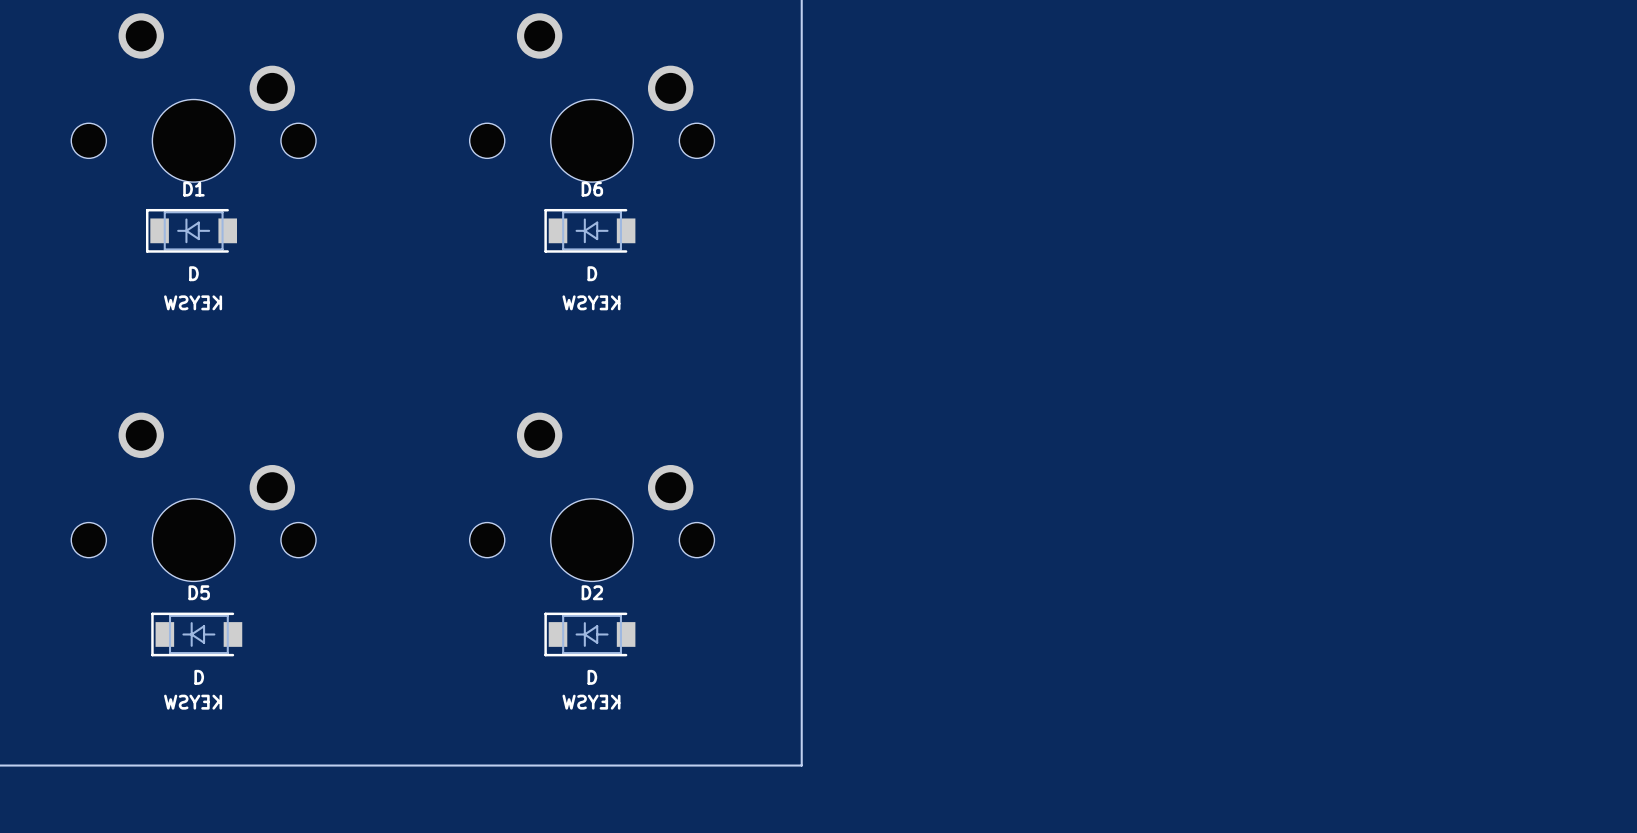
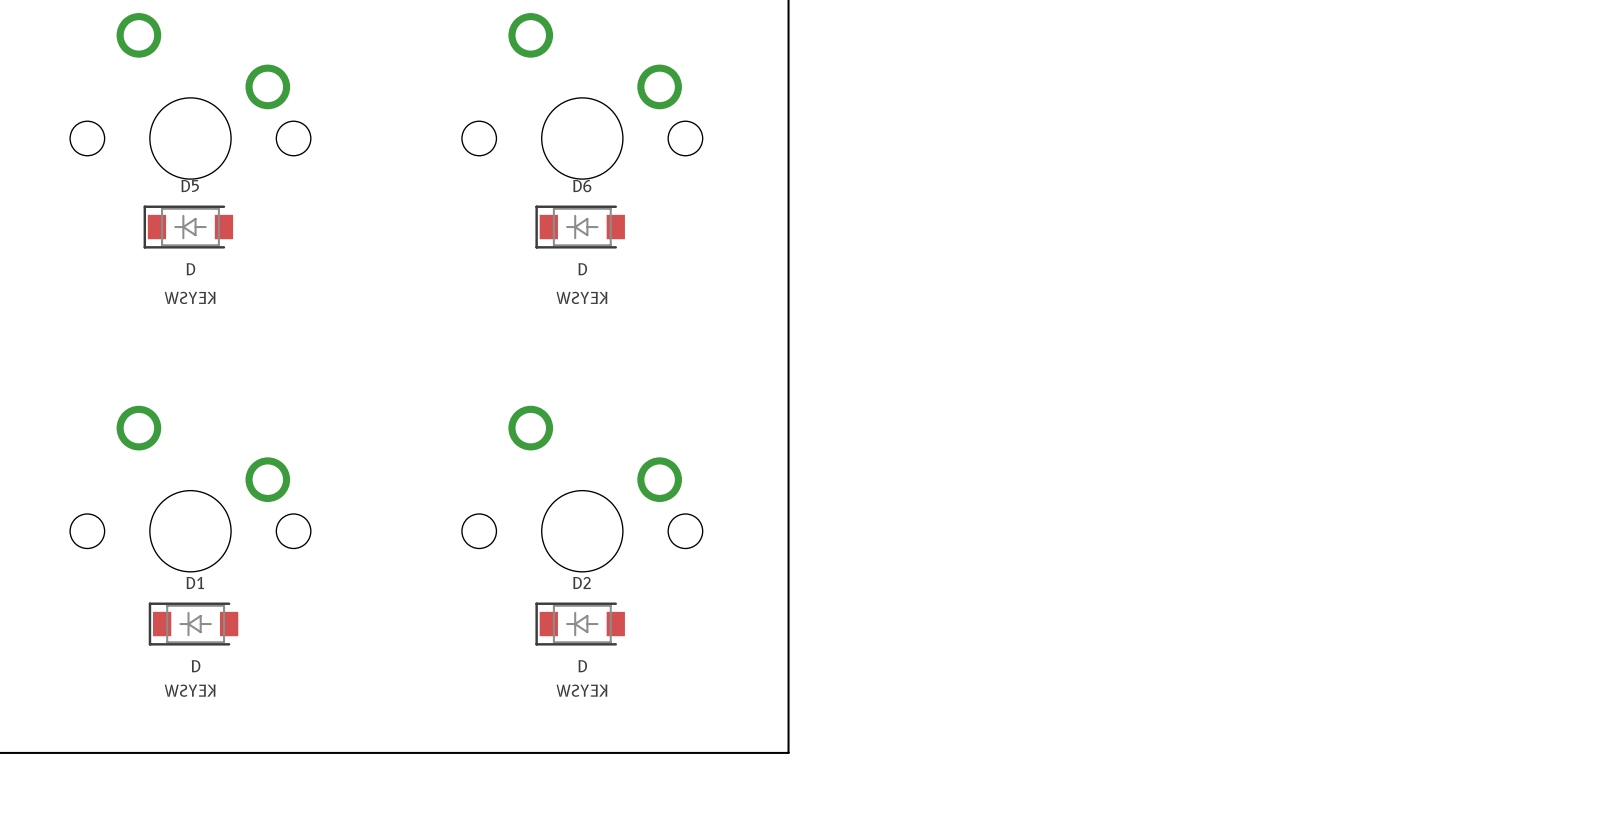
D1 name: D1 (193, 189) -> D5 (190, 186)
D5 name: D5 (199, 592) -> D1 (195, 582)

